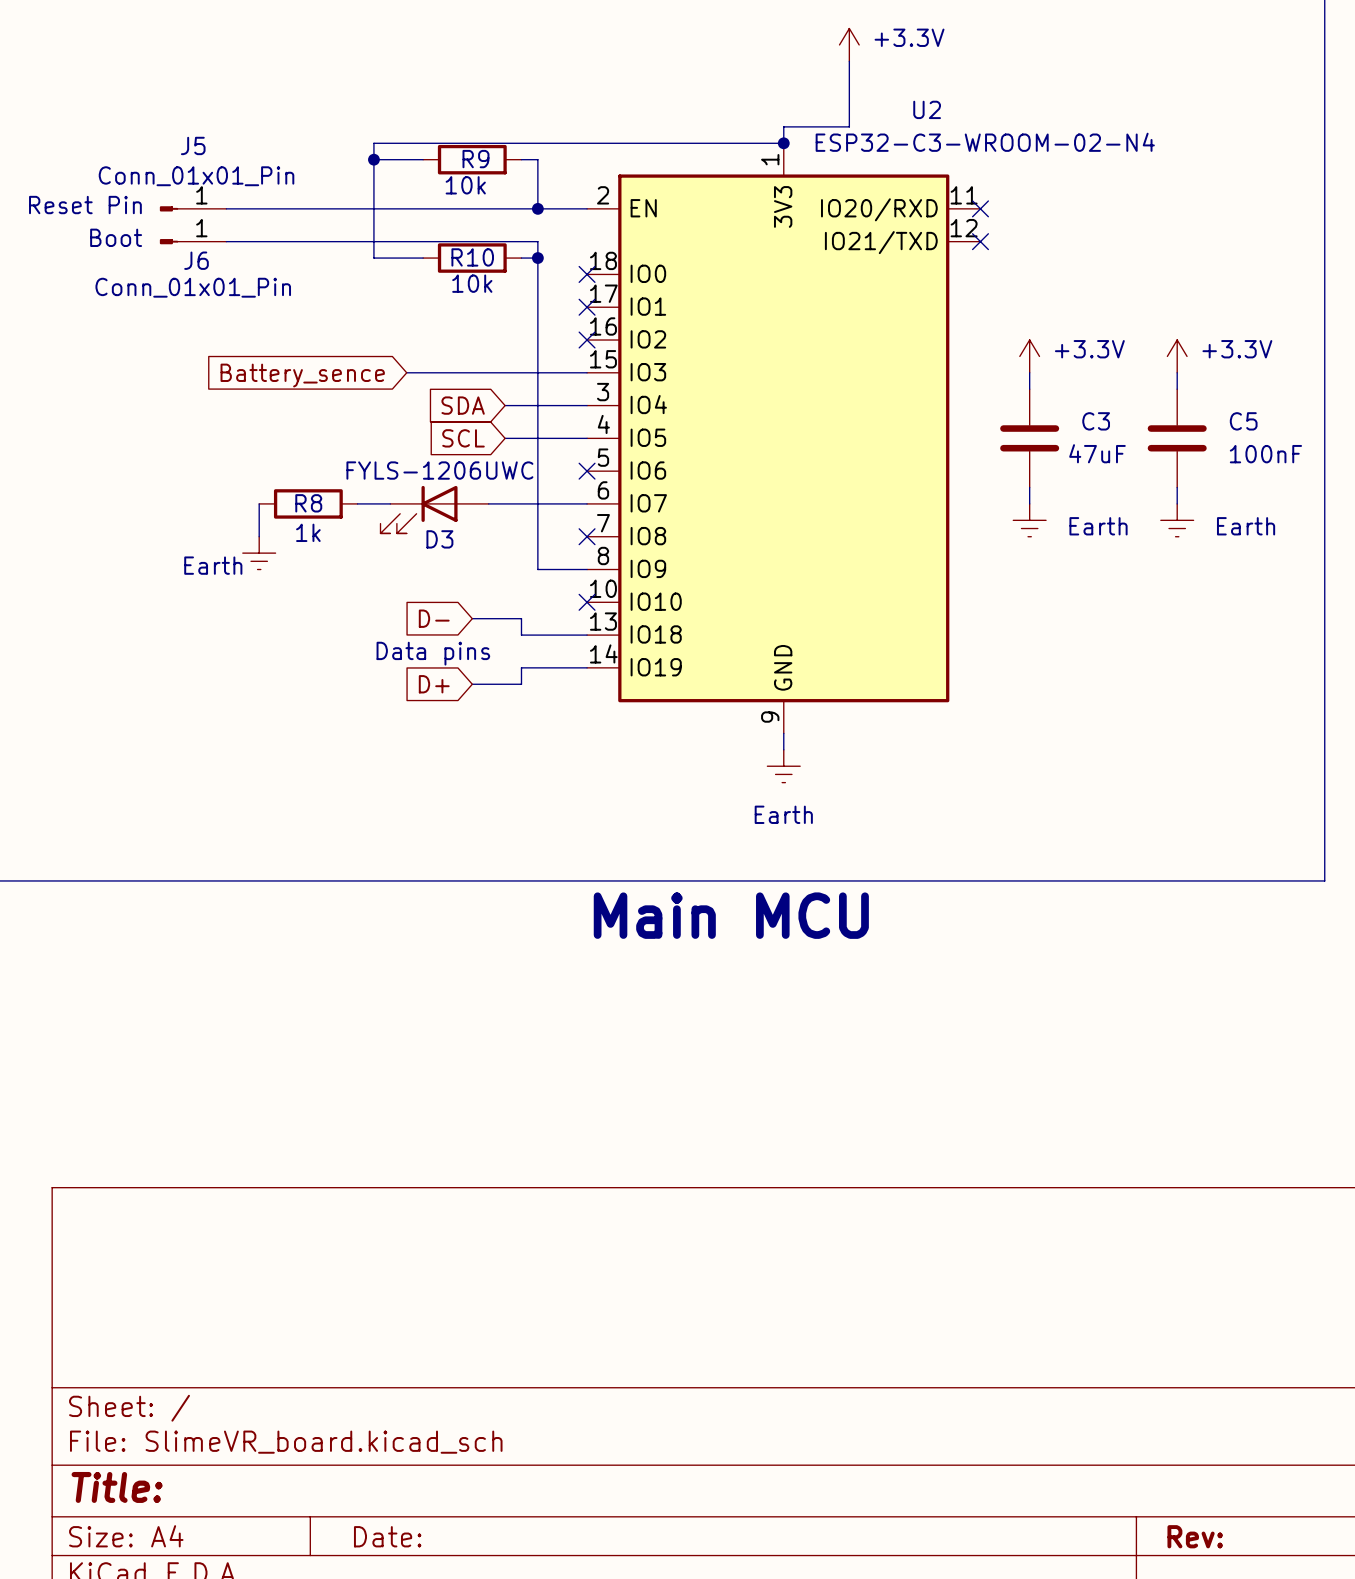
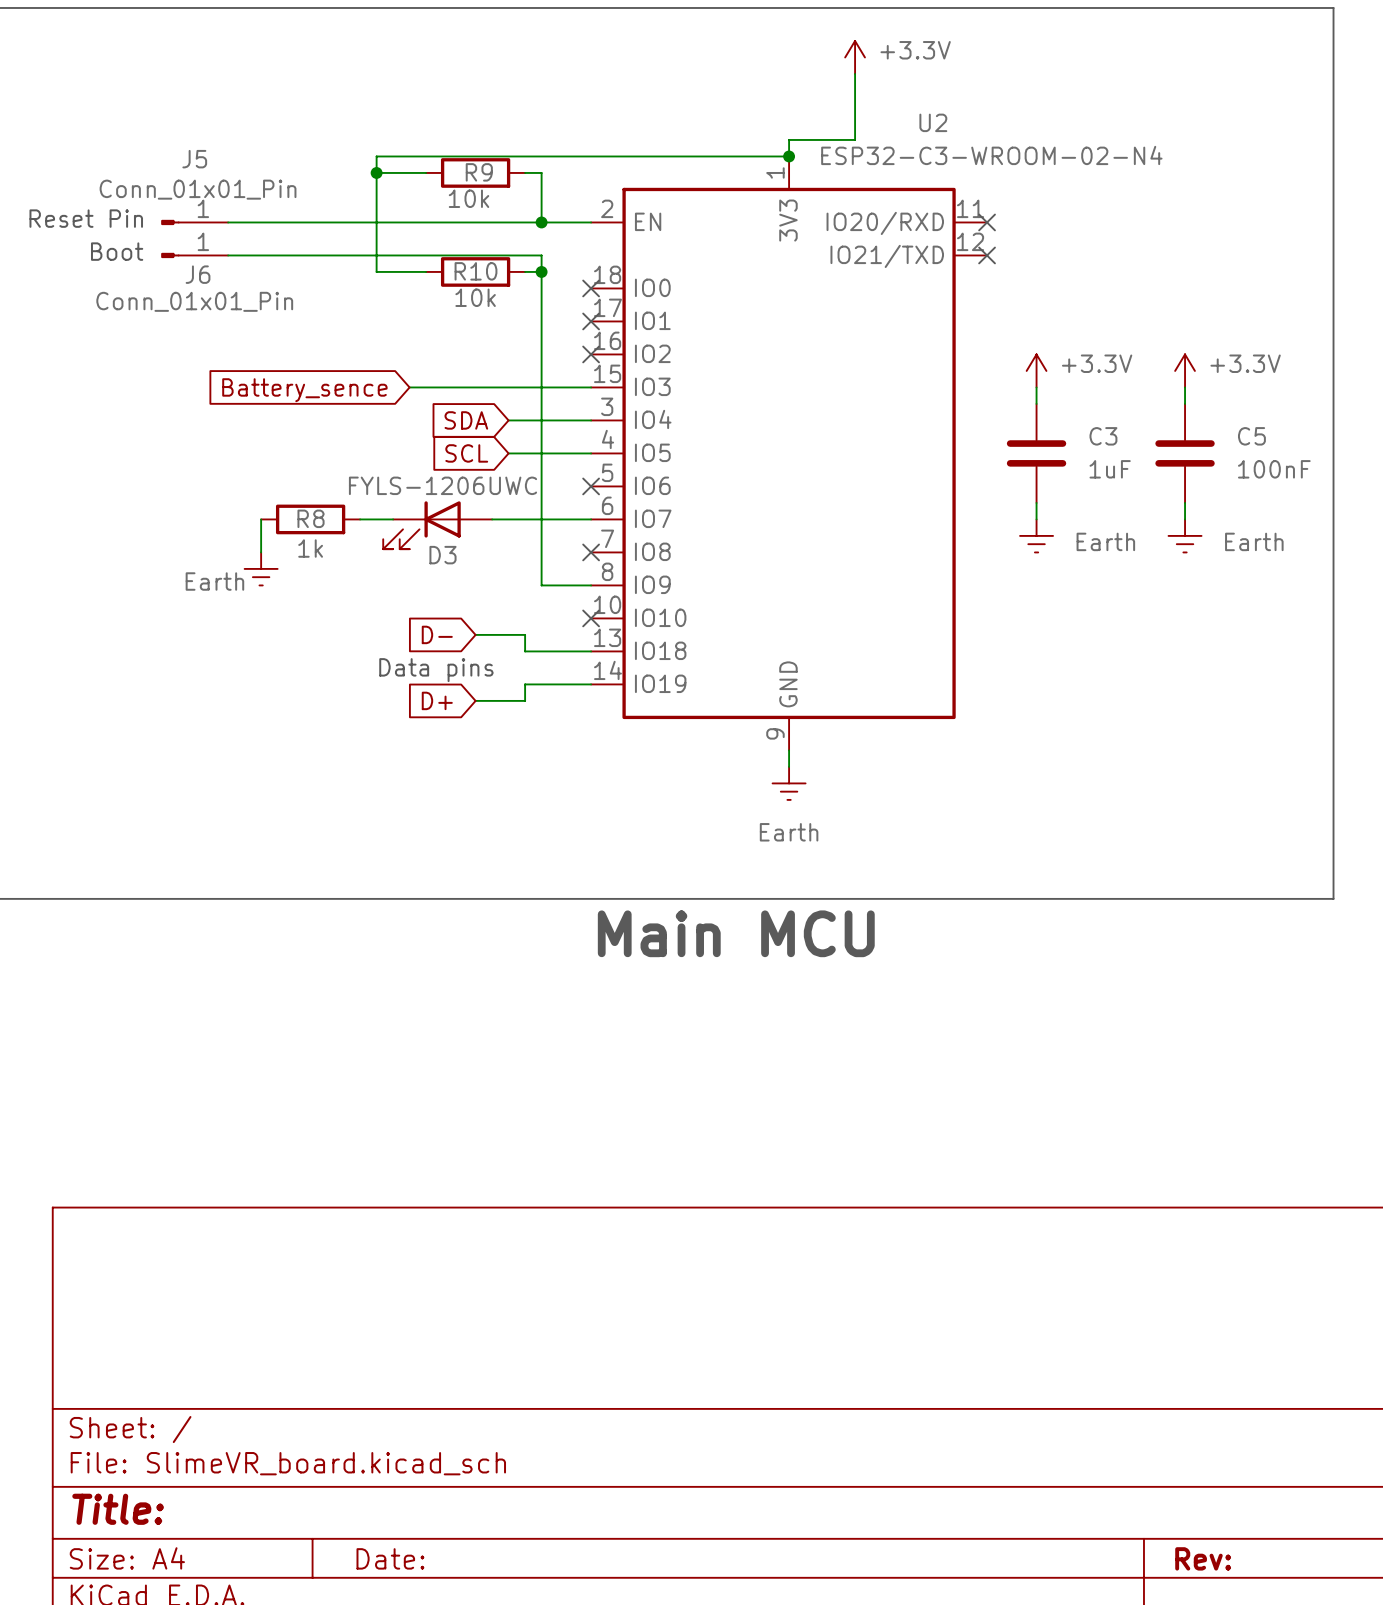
C3 value: 47uF (1097, 453) -> 1uF (1110, 469)

